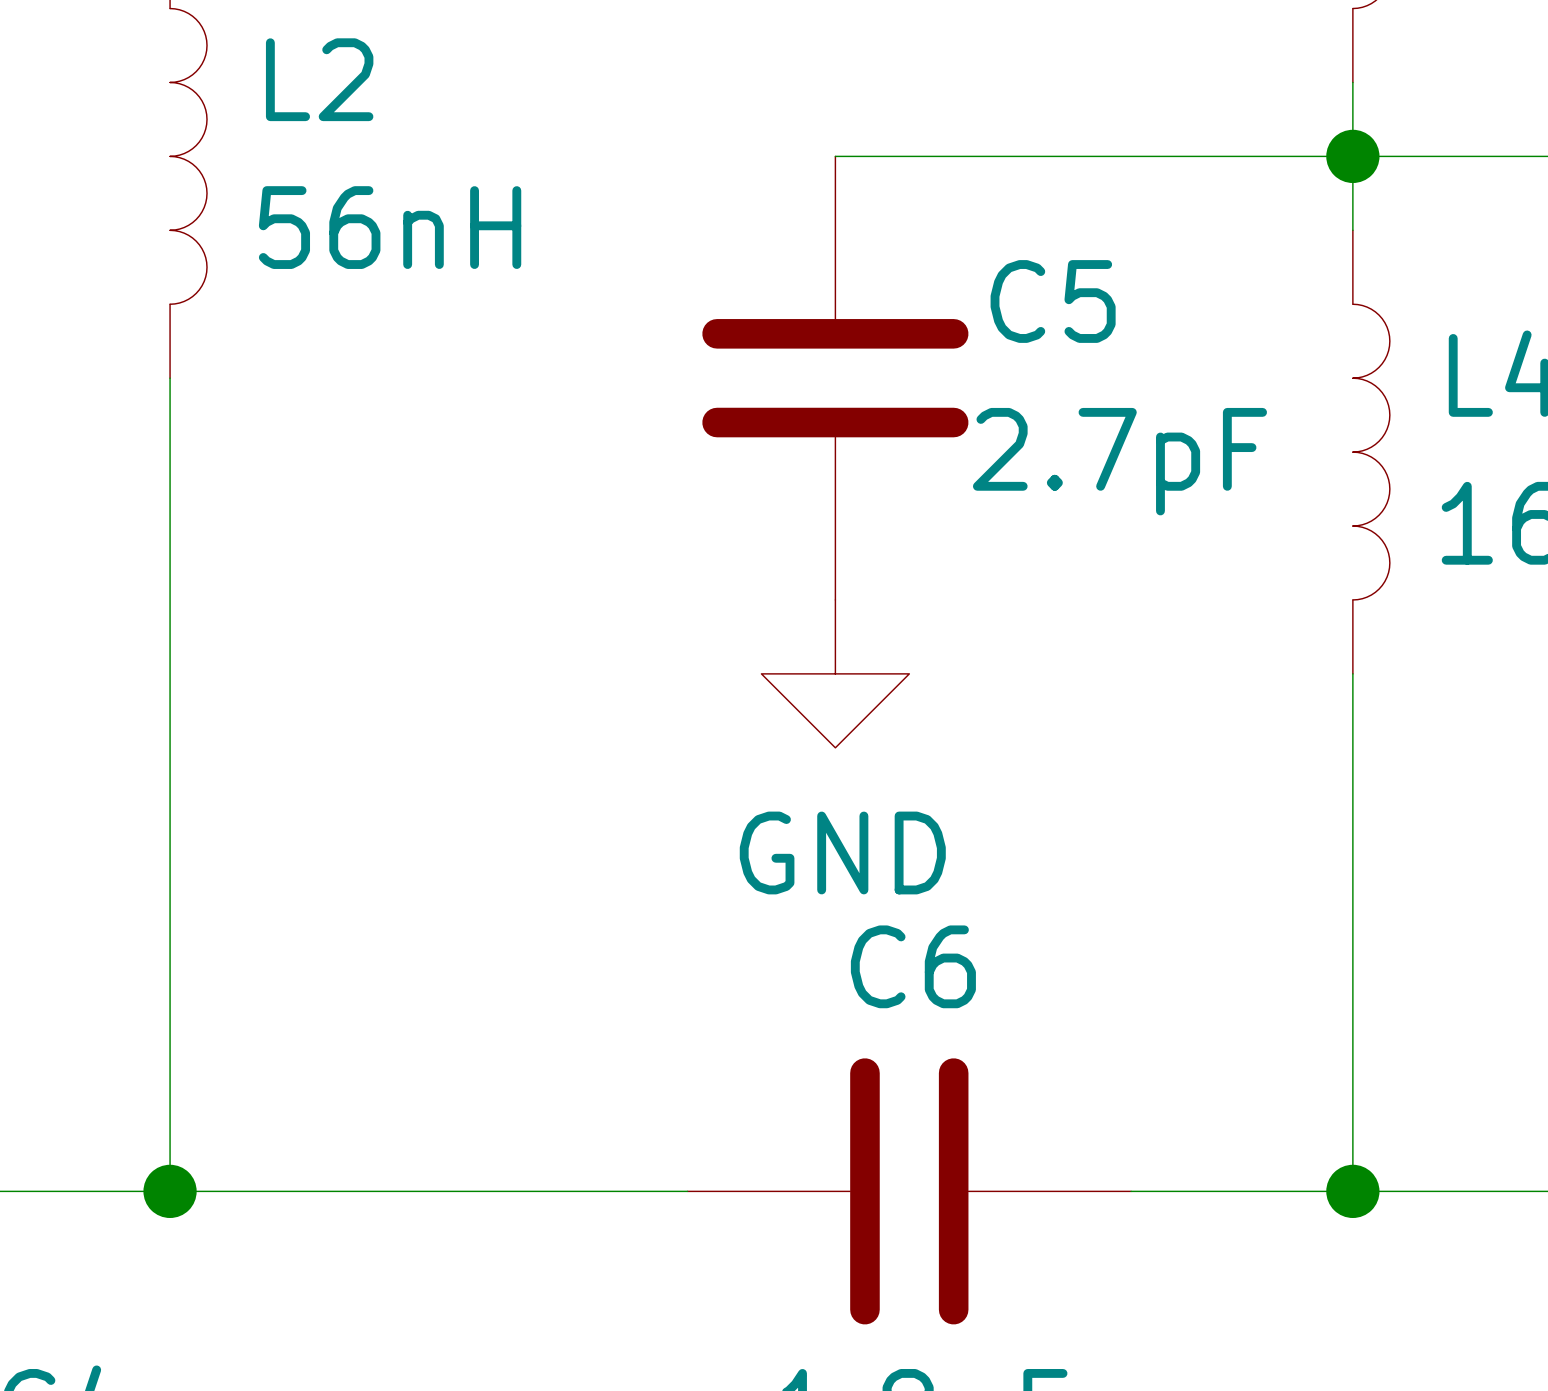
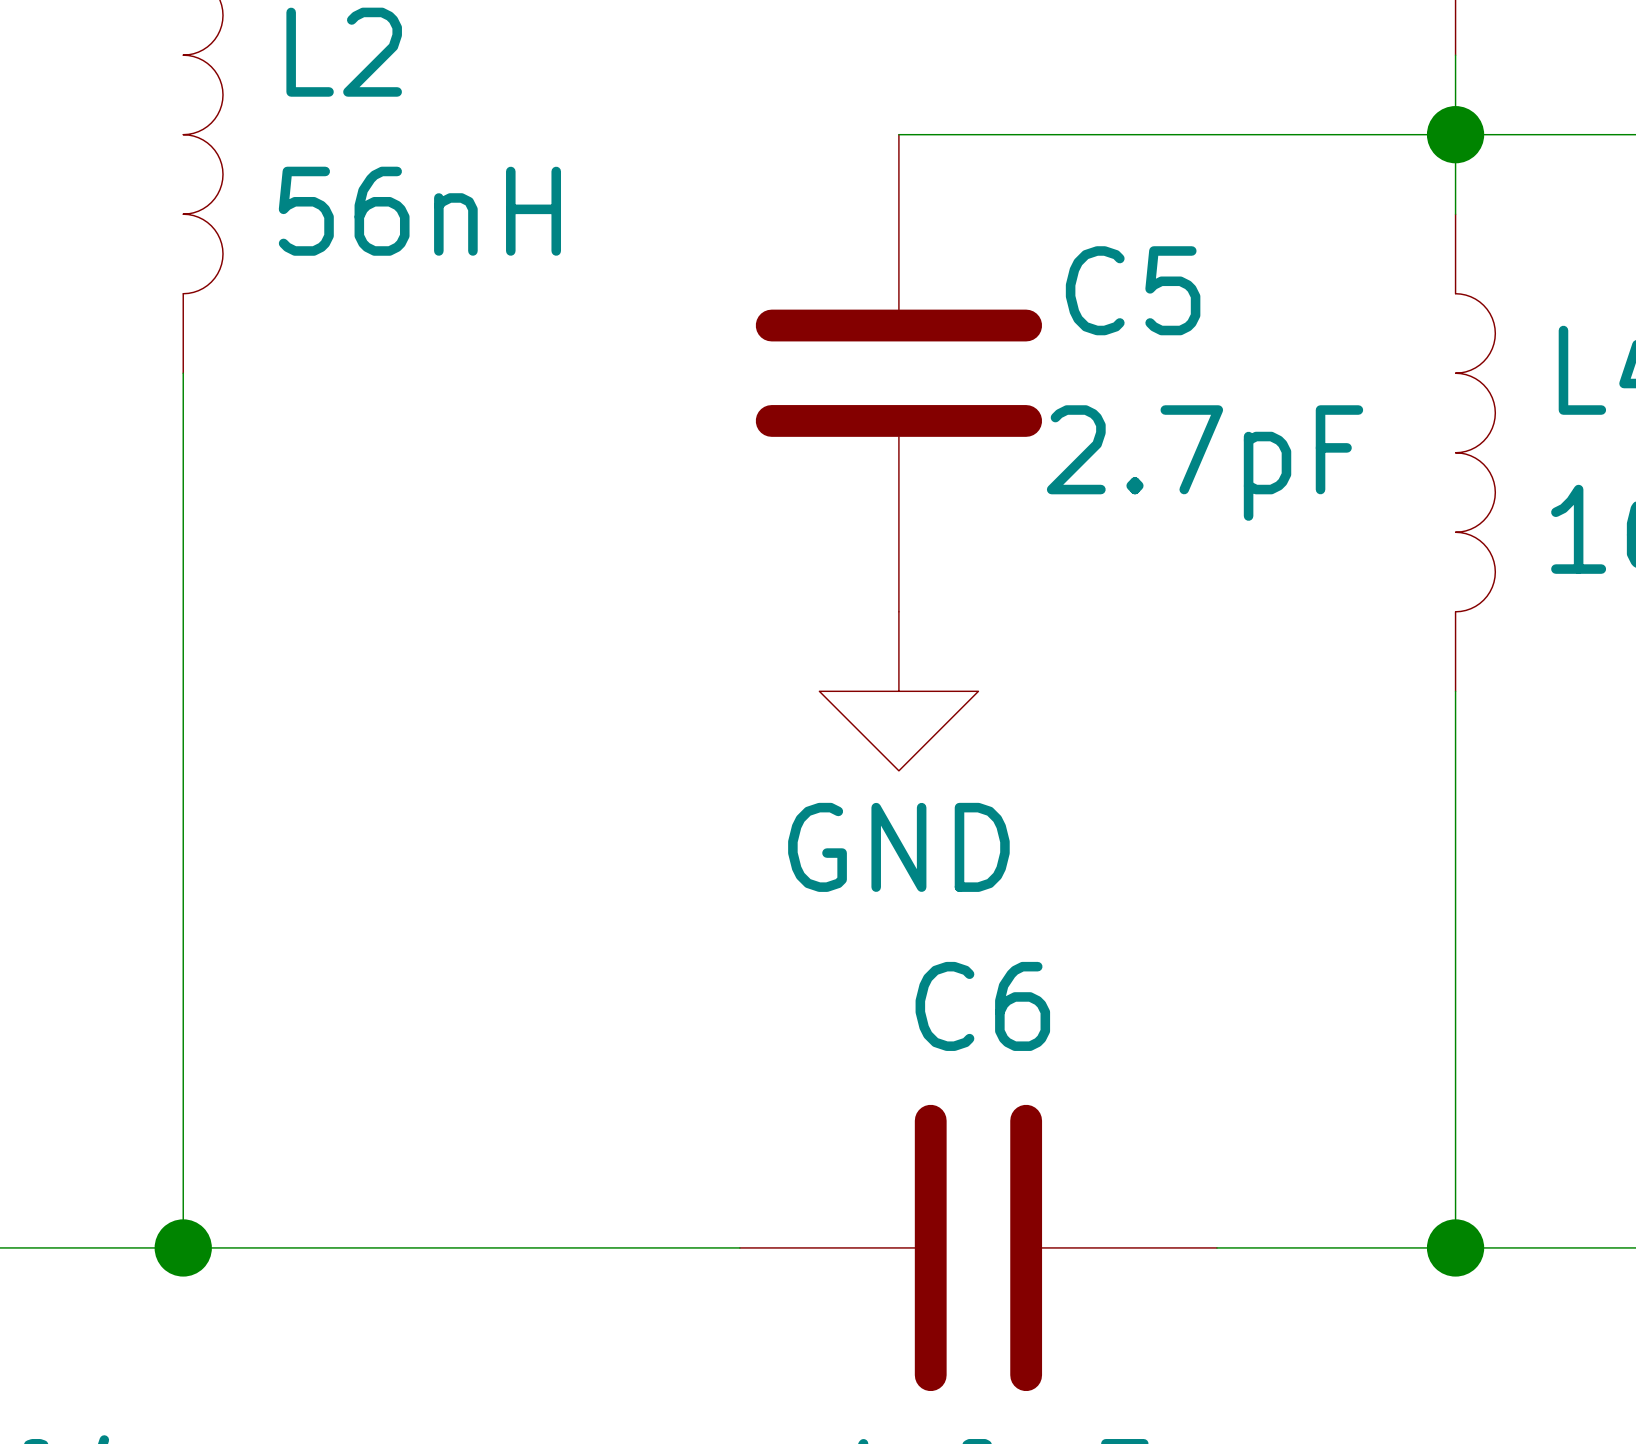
power symbol text position: GND (842, 852) -> GND (898, 847)

